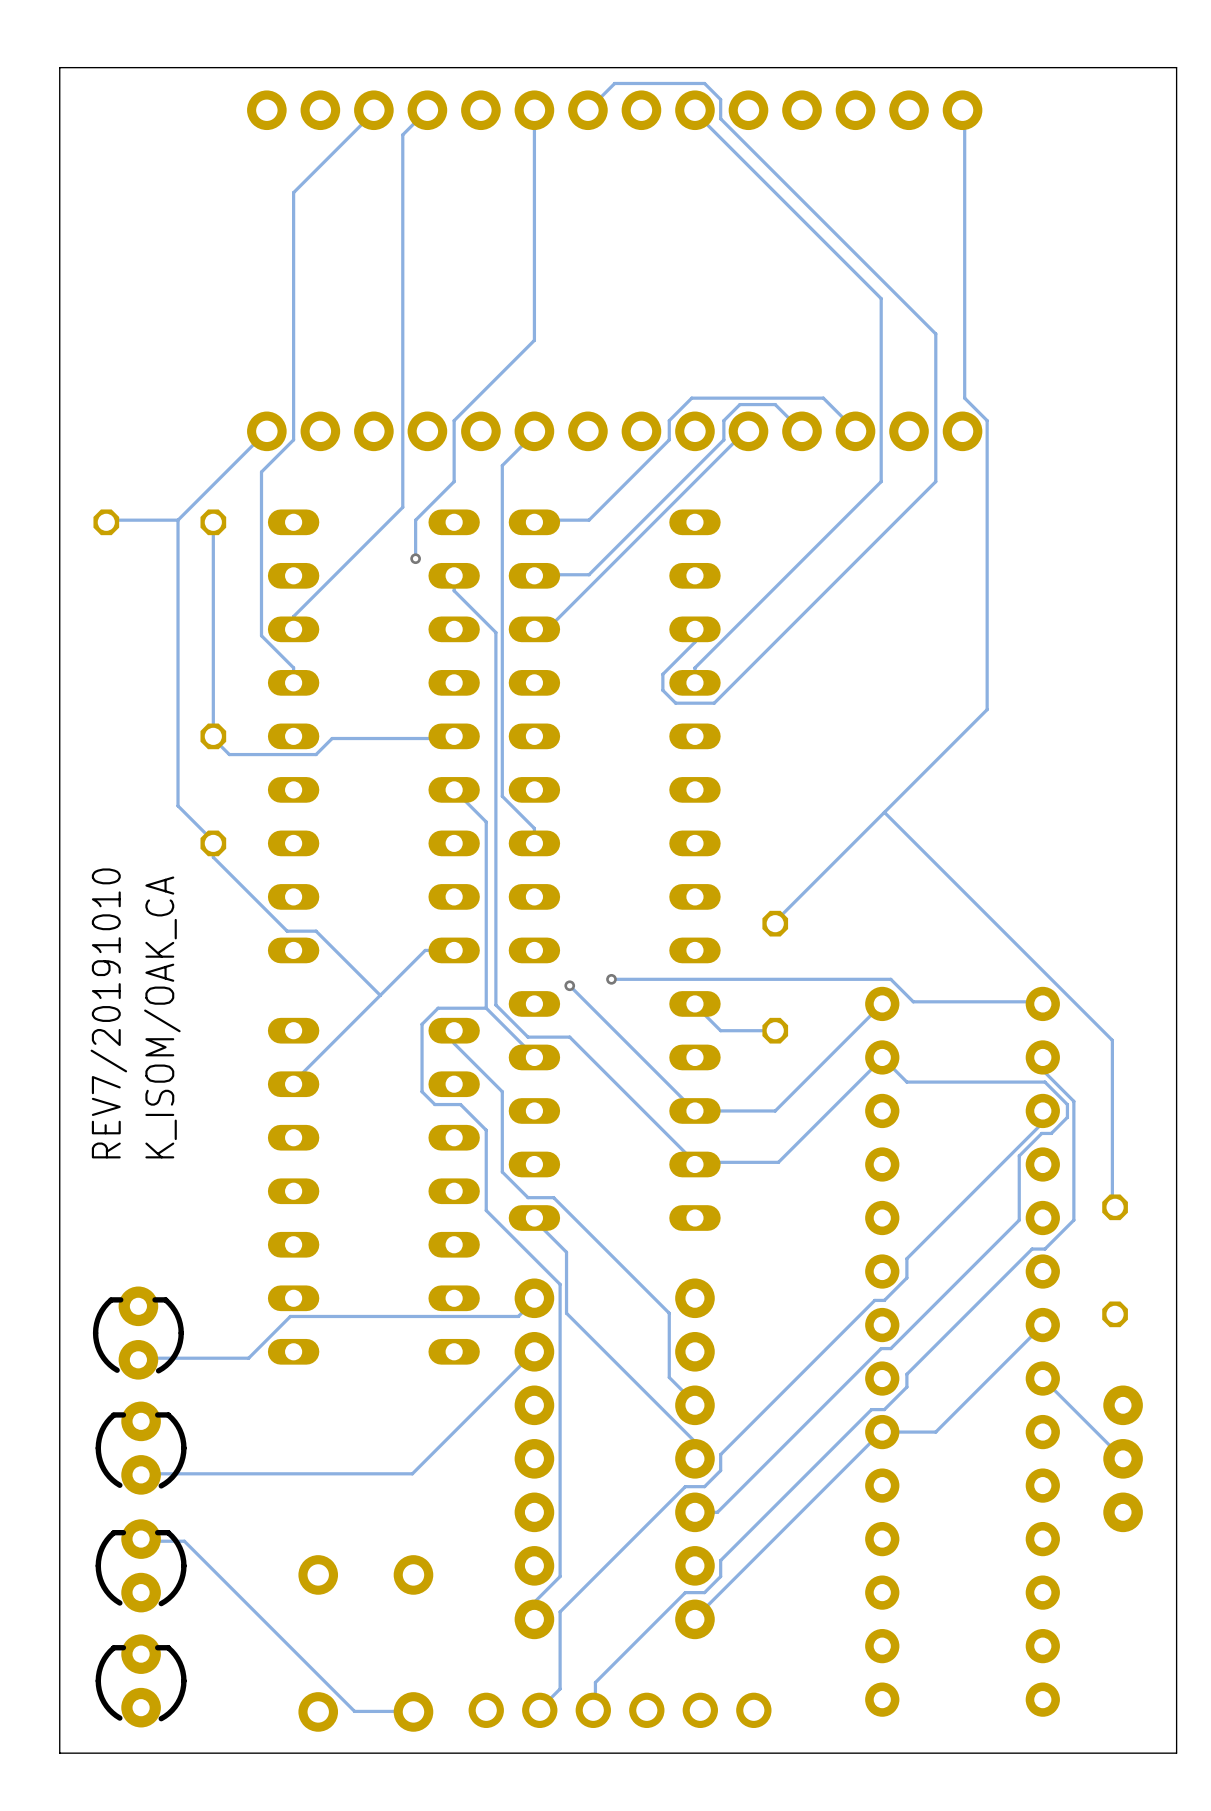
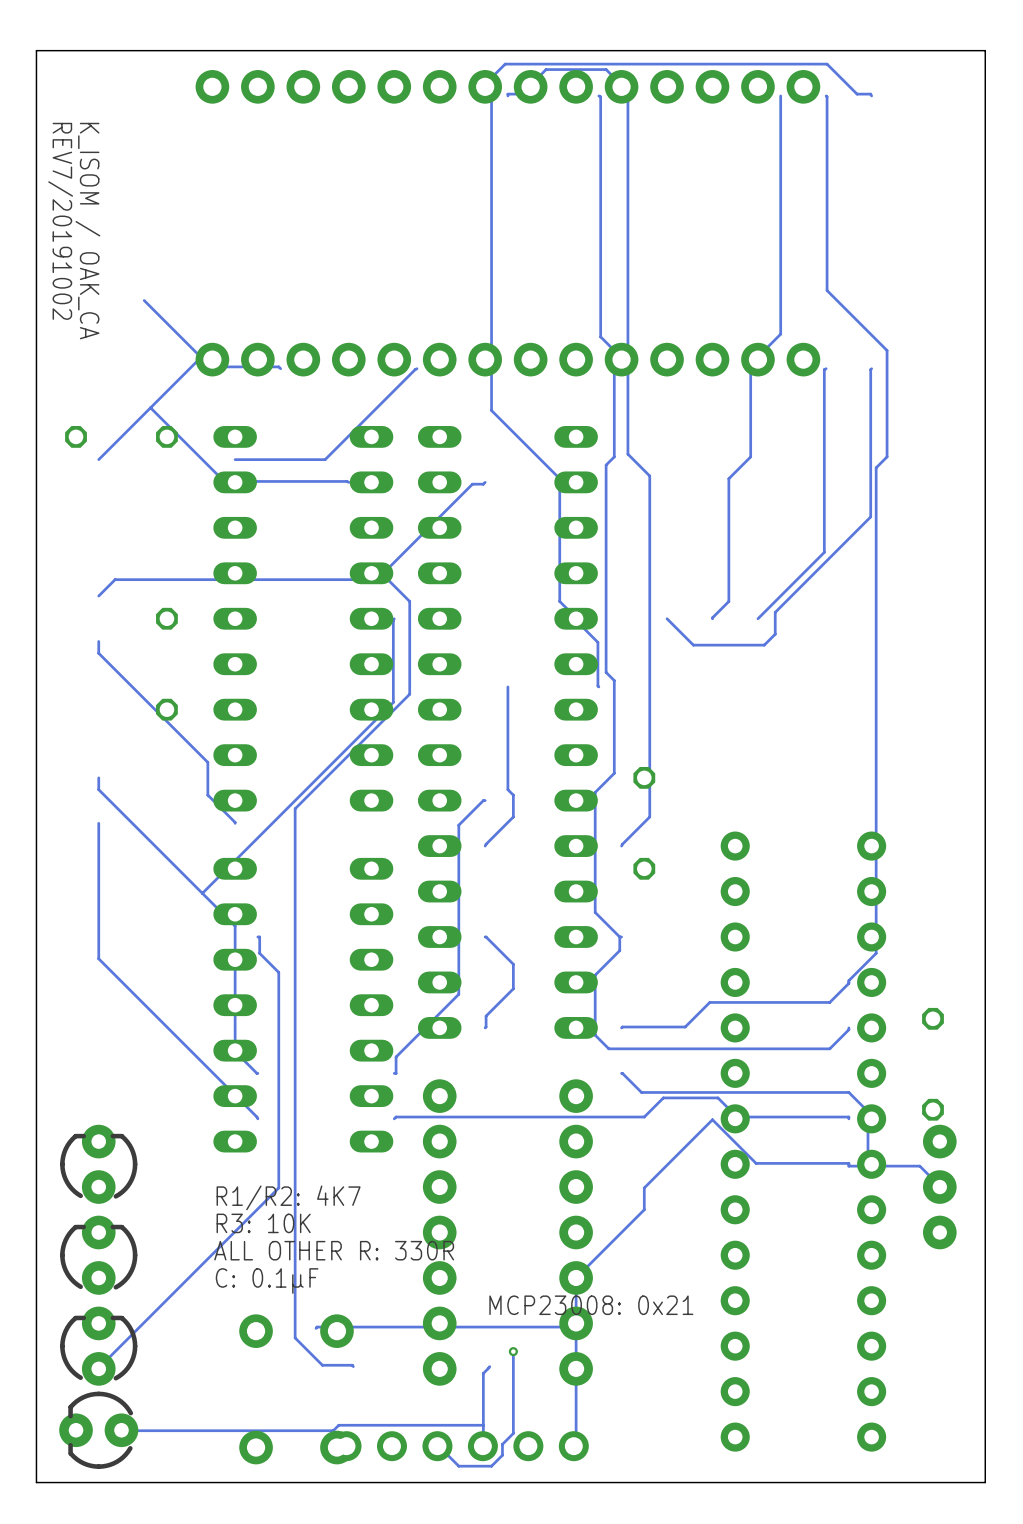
track: (614, 83) (587, 110) -> (507, 64) (505, 64) (491, 77) (491, 410) (559, 478) (559, 601) (597, 642) (598, 686)
track: (704, 83) (720, 99) (720, 118) (935, 333) -> (780, 95) (780, 276)
track: none -> (584, 64) (827, 64) (857, 94) (870, 94) (871, 95)
track: (373, 110) (293, 192) (293, 439) (261, 472) (261, 635) (293, 667) (293, 682) -> none
track: (427, 110) (402, 134) (402, 507) (293, 616) (293, 629) -> none
track: (534, 110) (534, 340) (454, 420) (454, 481) (415, 520) (415, 558) -> none
track: (694, 110) (694, 112) (881, 298) (881, 481) (694, 667) (694, 682) -> none
track: (962, 110) (964, 112) (964, 398) (987, 420) (987, 443) -> (826, 368) (824, 369)
track: none -> (507, 95) (507, 94) (521, 94) (546, 69) (606, 69) (627, 91) (627, 454) (649, 476) (649, 816) (621, 846)
track: none -> (598, 95) (600, 96) (600, 336) (614, 350) (614, 456) (606, 465) (606, 672) (614, 680) (614, 773) (595, 792) (595, 912) (619, 936) (619, 950) (595, 975) (595, 1035) (608, 1048) (829, 1048) (848, 1027)
track: none -> (826, 95) (827, 290) (887, 350) (887, 456) (876, 467) (876, 953) (829, 1002) (709, 1002) (685, 1027) (621, 1027)
text: none -> REV7/20191002 (60, 221)
text: none -> K_ISOM / OAK_CA (87, 231)
track: none -> (144, 300) (210, 366) (278, 366) (280, 368)
track: (935, 401) (935, 481) (714, 703) (675, 703) (662, 690) (662, 674) (694, 642) (694, 629) -> (780, 334) (750, 364) (750, 456) (728, 478) (728, 601) (712, 618)
track: none -> (202, 358) (199, 358) (98, 459)
track: (266, 431) (178, 520) -> none
track: (534, 431) (502, 465) (502, 796) (534, 828) (534, 843) -> none
track: (748, 431) (746, 430) (547, 629) (534, 629) -> none
track: (802, 431) (775, 404) (739, 404) (723, 420) (723, 439) (589, 574) (534, 575) -> none
track: (855, 431) (823, 398) (691, 398) (669, 420) (669, 439) (589, 520) (534, 520) (534, 522) -> none
track: none -> (416, 368) (325, 459) (235, 459)
track: none -> (871, 368) (870, 516) (775, 612) (775, 634) (764, 645) (693, 645) (667, 618)
track: none -> (150, 407) (224, 481) (348, 482)
track: (178, 520) (178, 805) (213, 841) (213, 857) -> (98, 641) (98, 653) (166, 721)
track: (178, 520) (107, 520) (106, 522) -> none
track: (213, 522) (213, 738) (229, 754) (316, 754) (332, 738) (454, 738) (454, 736) -> none
via: (415, 558) -> none
track: (454, 575) (454, 590) (495, 632) (495, 1005) (528, 1037) (569, 1037) (694, 1162) (778, 1162) (882, 1057) (906, 1082) (1044, 1082) (1067, 1104) (1067, 1117) (1051, 1133) (1041, 1133) (1019, 1155) (1019, 1220) (890, 1348) (881, 1348) (717, 1512) (694, 1512) -> none
track: none -> (485, 482) (483, 484) (472, 484) (376, 579) (115, 579) (98, 596)
track: (987, 658) (987, 709) (775, 921) (775, 923) -> (824, 552) (757, 618)
track: none -> (382, 574) (409, 601) (409, 694) (295, 808) (295, 1337) (322, 1365) (353, 1366)
track: none -> (394, 618) (393, 702) (202, 893)
track: (454, 789) (486, 821) (486, 1008) -> none
track: (884, 812) (1112, 1040) (1112, 1207) (1115, 1207) -> none
track: none -> (507, 686) (507, 789) (513, 795) (513, 816) (485, 846)
track: (261, 905) (287, 931) (316, 931) (380, 995) -> (207, 762) (207, 795) (235, 823)
track: none -> (98, 777) (98, 789) (235, 926) (235, 1051) (257, 1073)
track: (454, 950) (425, 950) (293, 1082) (293, 1084) -> none
track: none -> (485, 800) (458, 825) (458, 994) (396, 1057) (396, 1073) (394, 1073)
track: none -> (98, 823) (98, 958) (257, 1118)
track: (611, 979) (890, 979) (913, 1001) (1041, 1001) (1042, 1003) -> none
via: (611, 979) -> none
track: (569, 985) (694, 1110) (746, 1110) -> none
via: (569, 985) -> none
track: (694, 1003) (720, 1030) (775, 1030) -> none
track: (882, 1003) (775, 1110) (748, 1110) -> none
track: (486, 1008) (534, 1057) -> none
track: (486, 1008) (438, 1008) (422, 1024) (422, 1091) (434, 1104) (460, 1104) (486, 1130) (486, 1210) (560, 1284) (560, 1576) (534, 1602) (534, 1619) -> none
text: REV7/20191010 (108, 1013) -> none
text: K_ISOM/OAK_CA (162, 1017) -> none
track: (454, 1030) (454, 1043) (502, 1091) (502, 1171) (528, 1197) (553, 1197) (669, 1313) (669, 1377) (694, 1405) -> none
track: (1042, 1057) (1044, 1059) (1044, 1072) (1073, 1101) (1073, 1220) (1044, 1249) (1032, 1249) (906, 1374) (906, 1387) (884, 1409) (871, 1409) (720, 1560) (720, 1576) (704, 1592) (685, 1592) (595, 1682) (595, 1708) (593, 1710) -> none
track: none -> (257, 936) (259, 936) (259, 953) (278, 972) (278, 1187) (98, 1368)
track: none -> (485, 936) (513, 964) (513, 988) (486, 1016) (485, 1027)
track: (1042, 1110) (1041, 1123) (906, 1258) (906, 1277) (884, 1300) (874, 1300) (720, 1454) (720, 1470) (704, 1486) (685, 1486) (560, 1611) (560, 1688) (539, 1710) -> none
track: (534, 1218) (566, 1252) (566, 1313) (694, 1441) (694, 1458) -> none
track: none -> (621, 1073) (641, 1092) (848, 1092) (867, 1111) (867, 1166)
track: (534, 1298) (518, 1316) (290, 1316) (248, 1358) (139, 1358) (138, 1359) -> none
track: none -> (848, 1118) (848, 1117) (737, 1117) (717, 1097) (663, 1097) (644, 1117) (396, 1117) (394, 1118)
track: (1042, 1325) (935, 1432) (881, 1432) (694, 1618) -> (939, 1187) (919, 1166) (848, 1166) (848, 1163) (756, 1163) (712, 1119) (644, 1187) (644, 1209) (576, 1277) (576, 1367)
part: (138, 1333) -> none
track: (534, 1351) (412, 1473) (141, 1474) -> none
part: none -> (98, 1164)
track: (1042, 1378) (1123, 1458) -> none
text: none -> R1/R2: 4K7 (288, 1197)
part: (141, 1448) -> none
text: none -> R3: 10K (263, 1223)
part position: (1123, 1458) -> (939, 1187)
text: none -> ALL OTHER R: 330R (334, 1250)
part: none -> (98, 1255)
text: none -> C: 0.1µF (267, 1280)
track: (141, 1539) (142, 1541) (184, 1541) (354, 1711) (413, 1711) -> none
text: none -> MCP23008: 0x21 (591, 1305)
part position: (141, 1565) -> (98, 1346)
track: none -> (576, 1327) (316, 1328)
track: none -> (513, 1351) (513, 1433) (502, 1444) (502, 1455) (491, 1466) (458, 1466) (437, 1446)
via: none -> (513, 1351)
track: none -> (489, 1366) (483, 1373) (482, 1446)
track: none -> (576, 1368) (576, 1444) (573, 1446)
part rotation: 0° (141, 1680) -> 90° counterclockwise (98, 1430)
track: none -> (483, 1425) (338, 1425) (333, 1430) (121, 1430)
part position: (620, 1710) -> (460, 1446)

